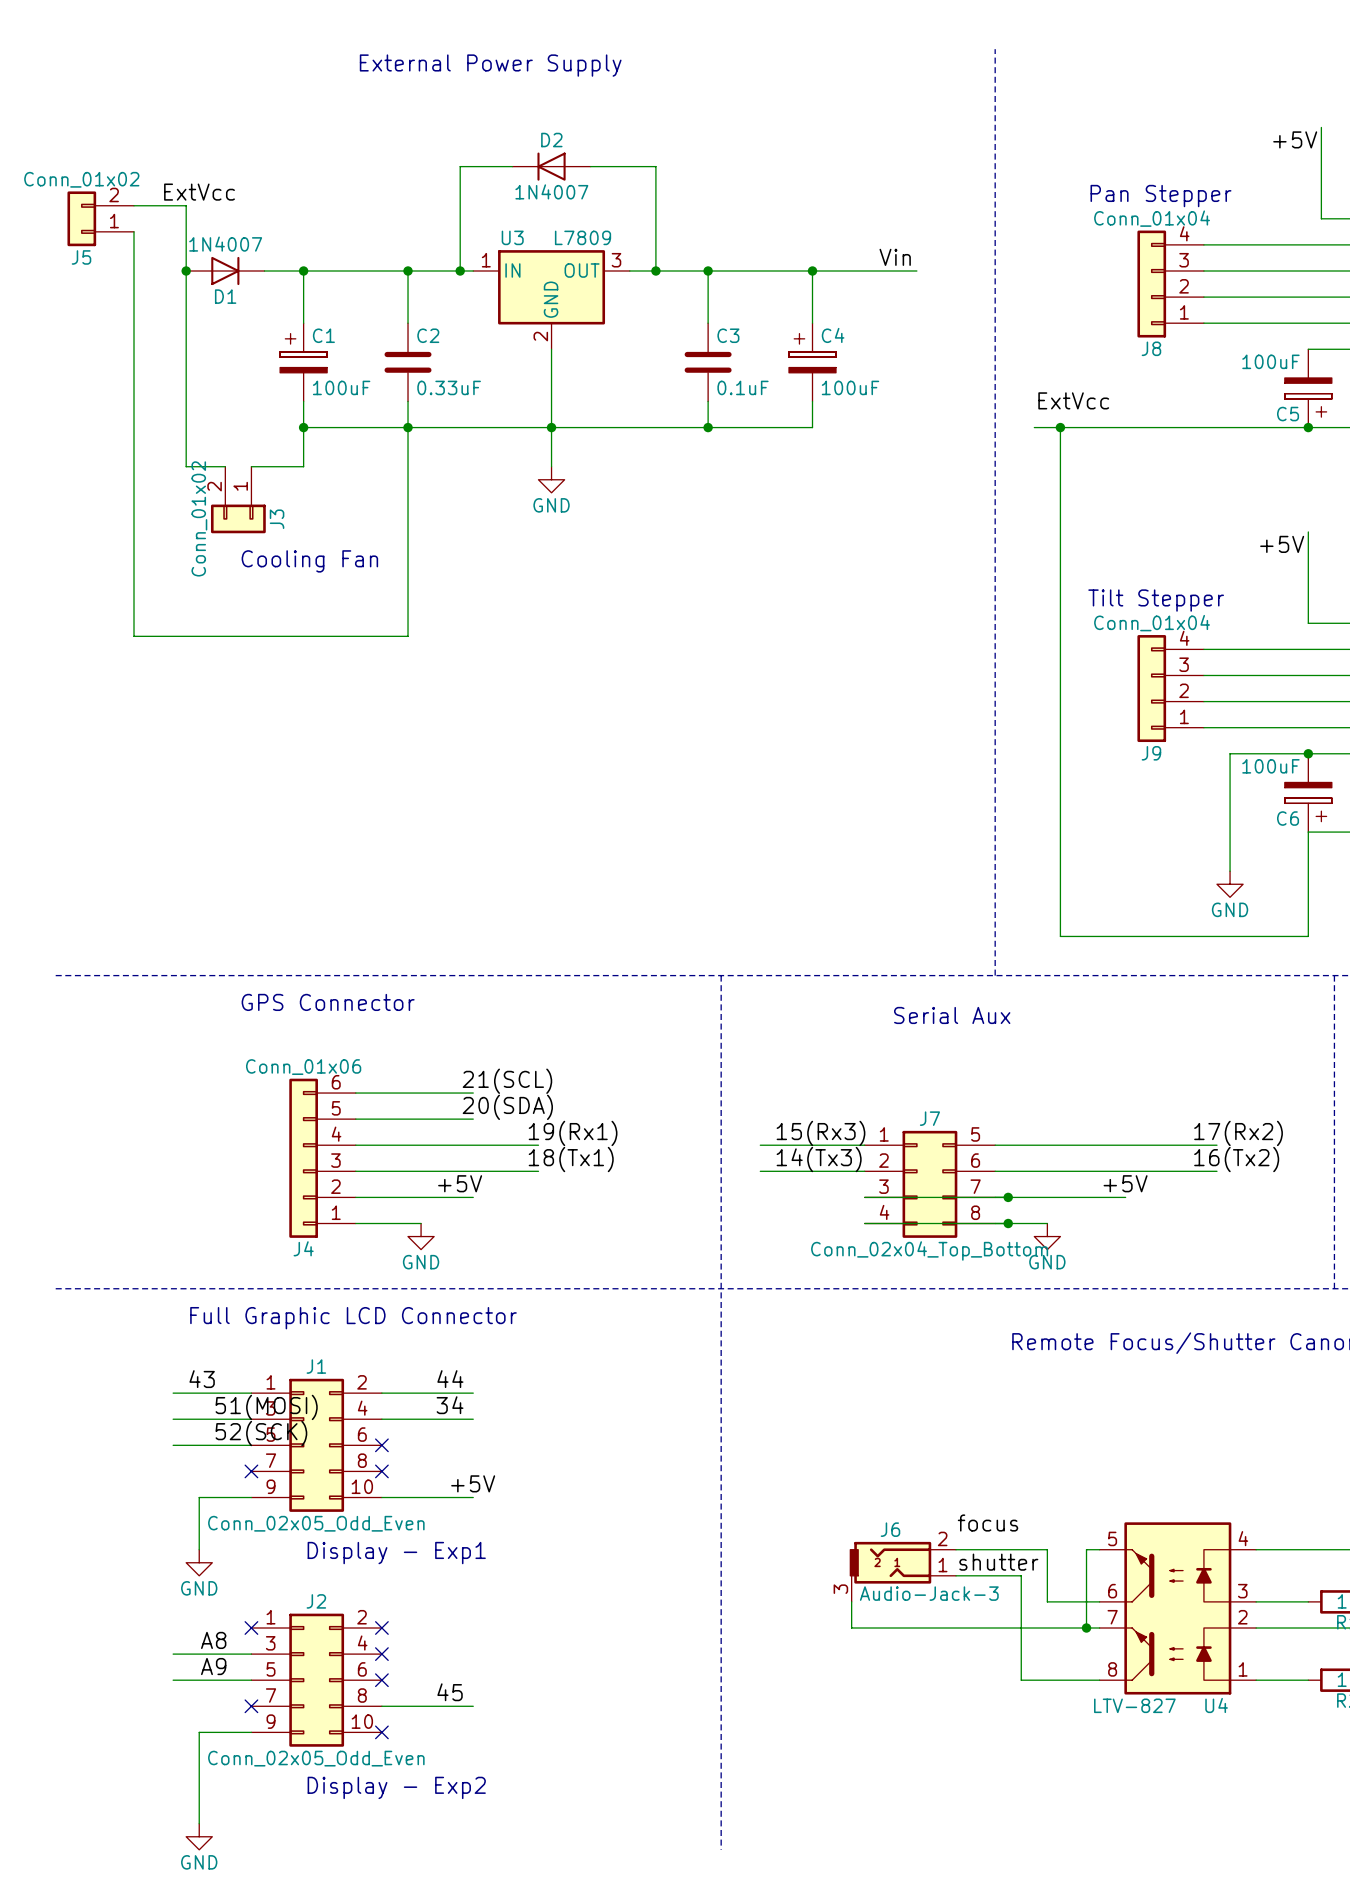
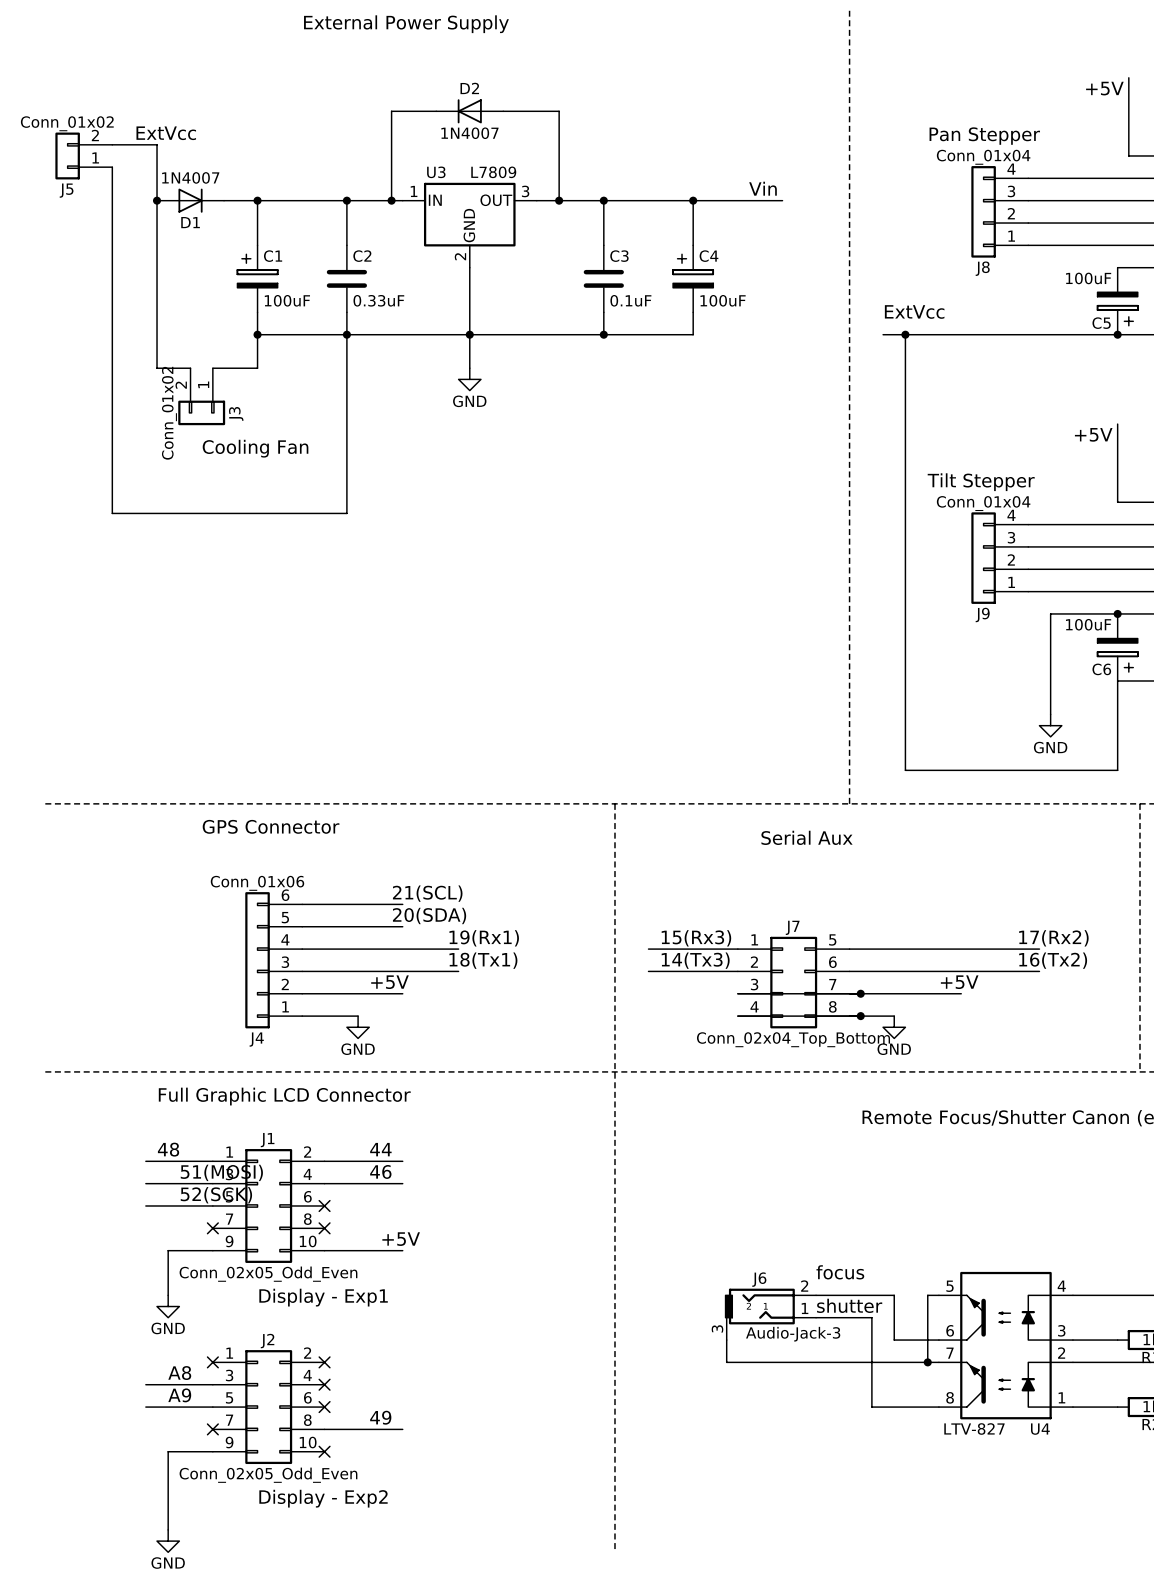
label: 43 (202, 1379) -> 48 (168, 1149)
label: 34 (450, 1405) -> 46 (380, 1171)
label: 45 (450, 1692) -> 49 (380, 1417)

